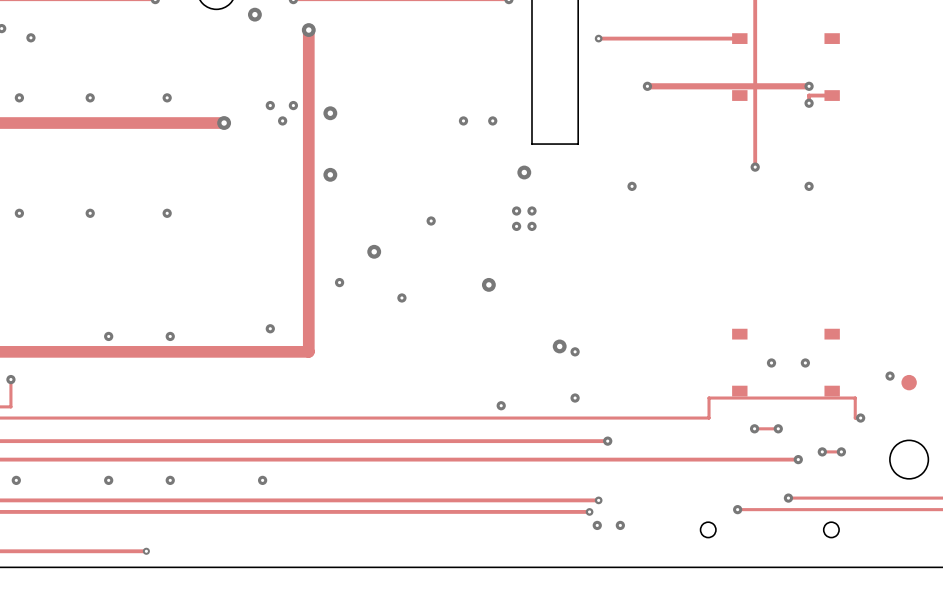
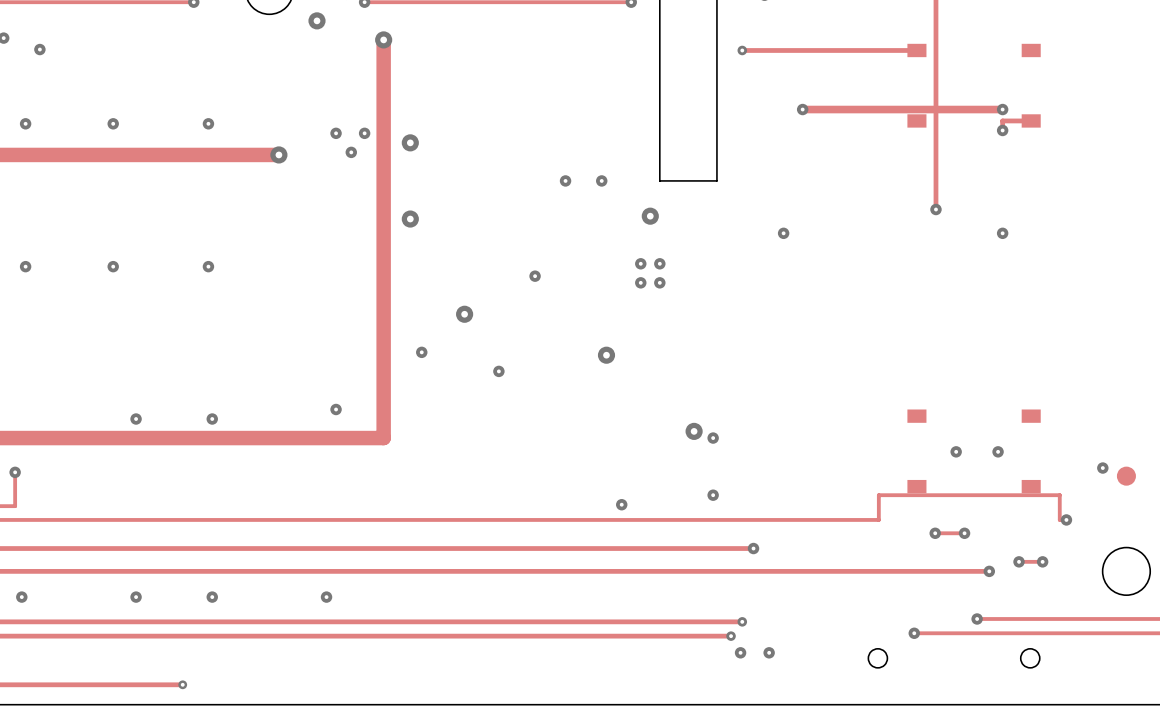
via: (463, 120) -> none
via: (492, 120) -> none
via: none -> (565, 180)
via: none -> (601, 180)

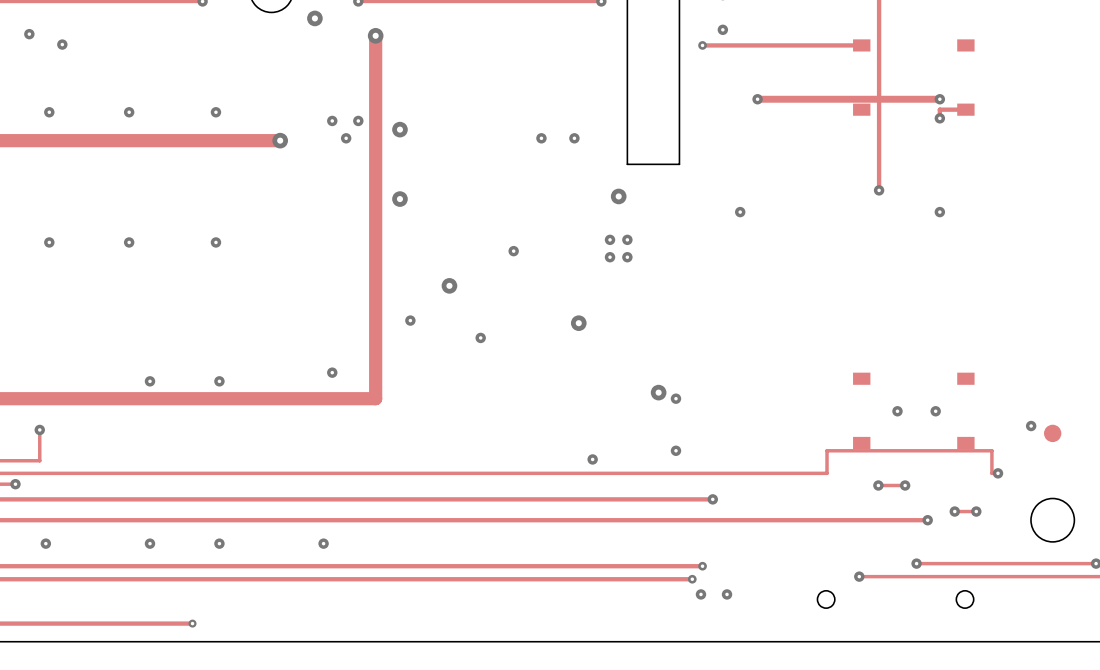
via: none -> (722, 29)
via: none -> (541, 138)
via: none -> (574, 138)
via: (565, 180) -> none
via: (601, 180) -> none

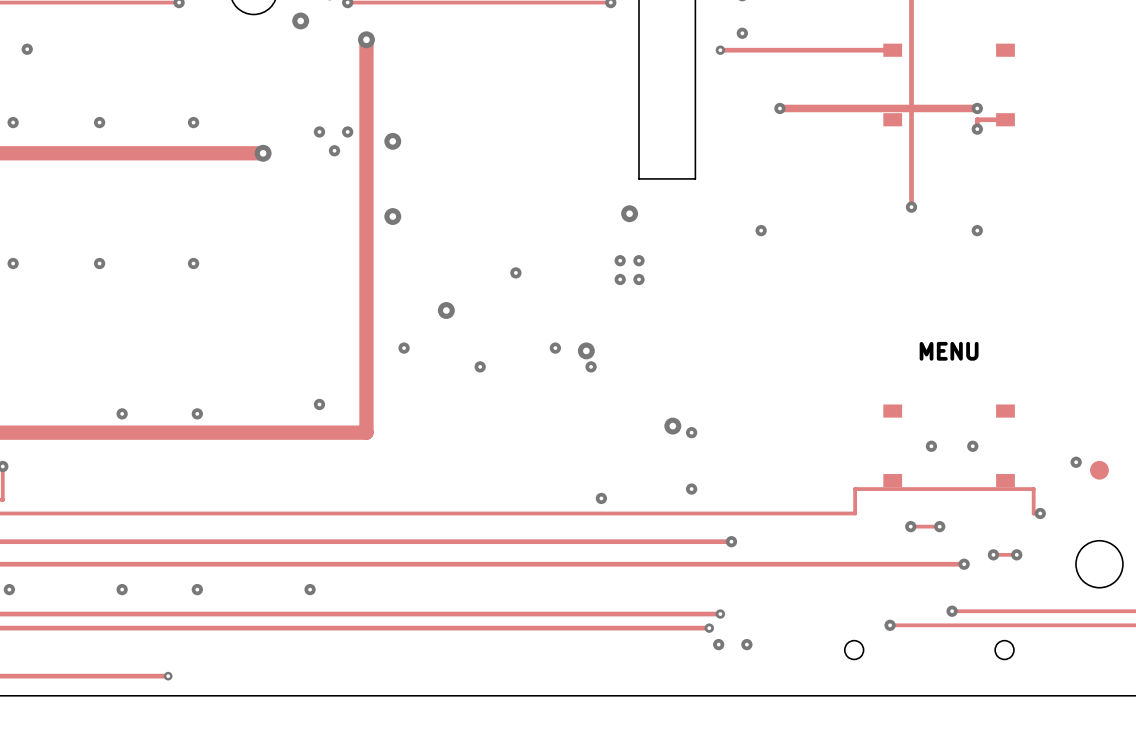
via: (541, 138) -> none
via: (574, 138) -> none
via: none -> (555, 348)
text: none -> MENU (949, 351)
via: none -> (591, 366)

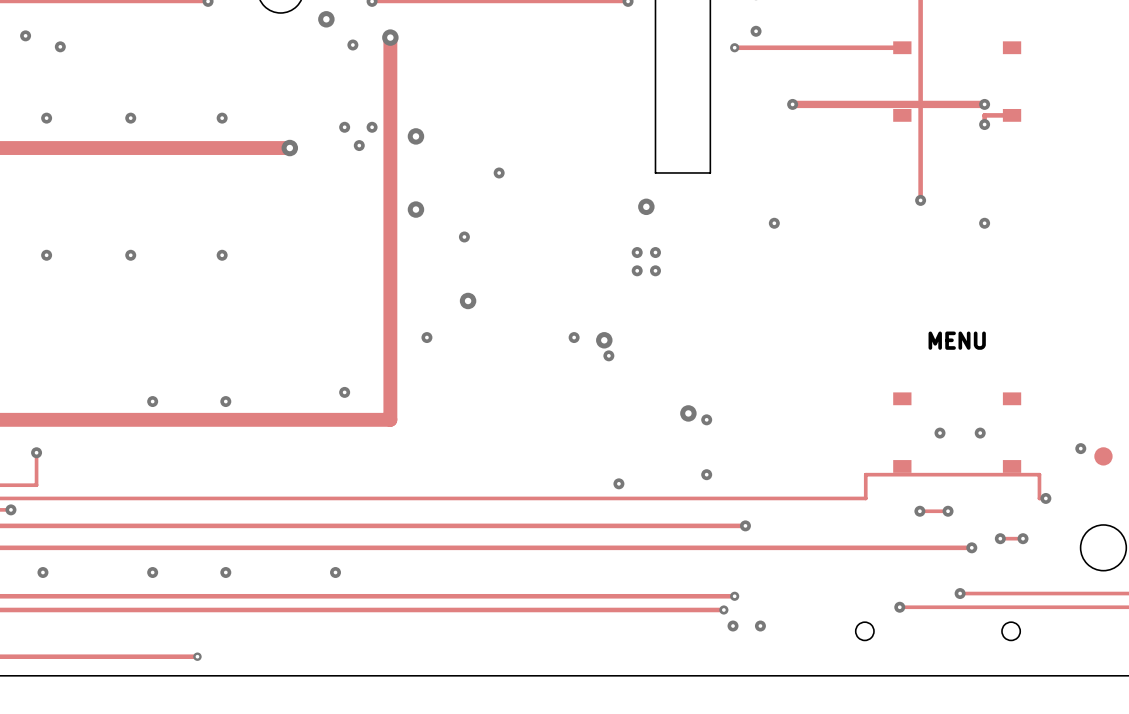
via: none -> (352, 45)
via: none -> (499, 172)
via: none -> (464, 236)
via: (515, 272) -> none
via: (480, 366) -> none

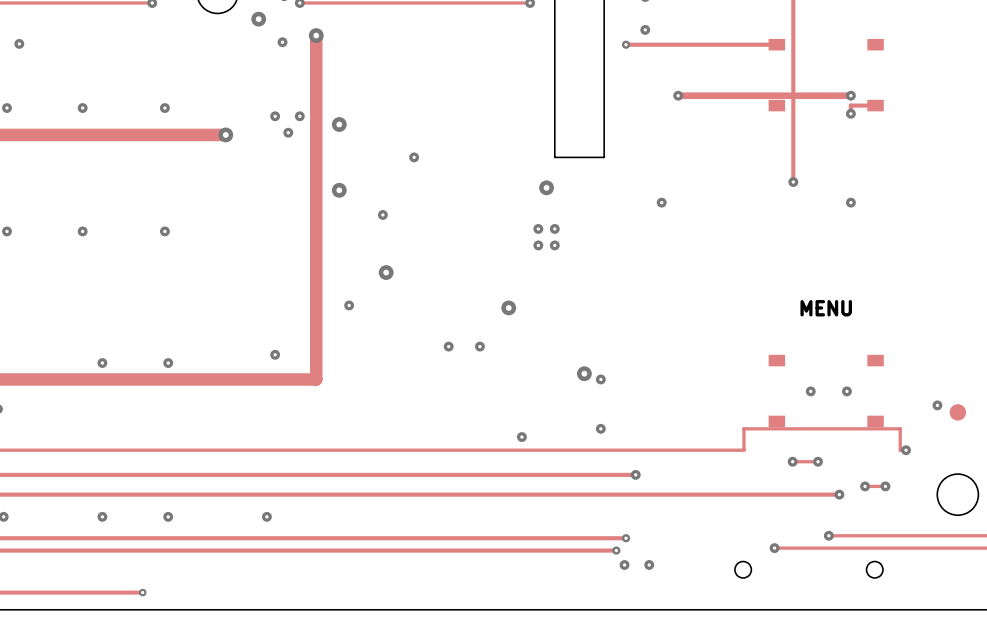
via: (574, 337) -> none
via: (608, 355) -> none
via: none -> (448, 346)
via: none -> (479, 346)

